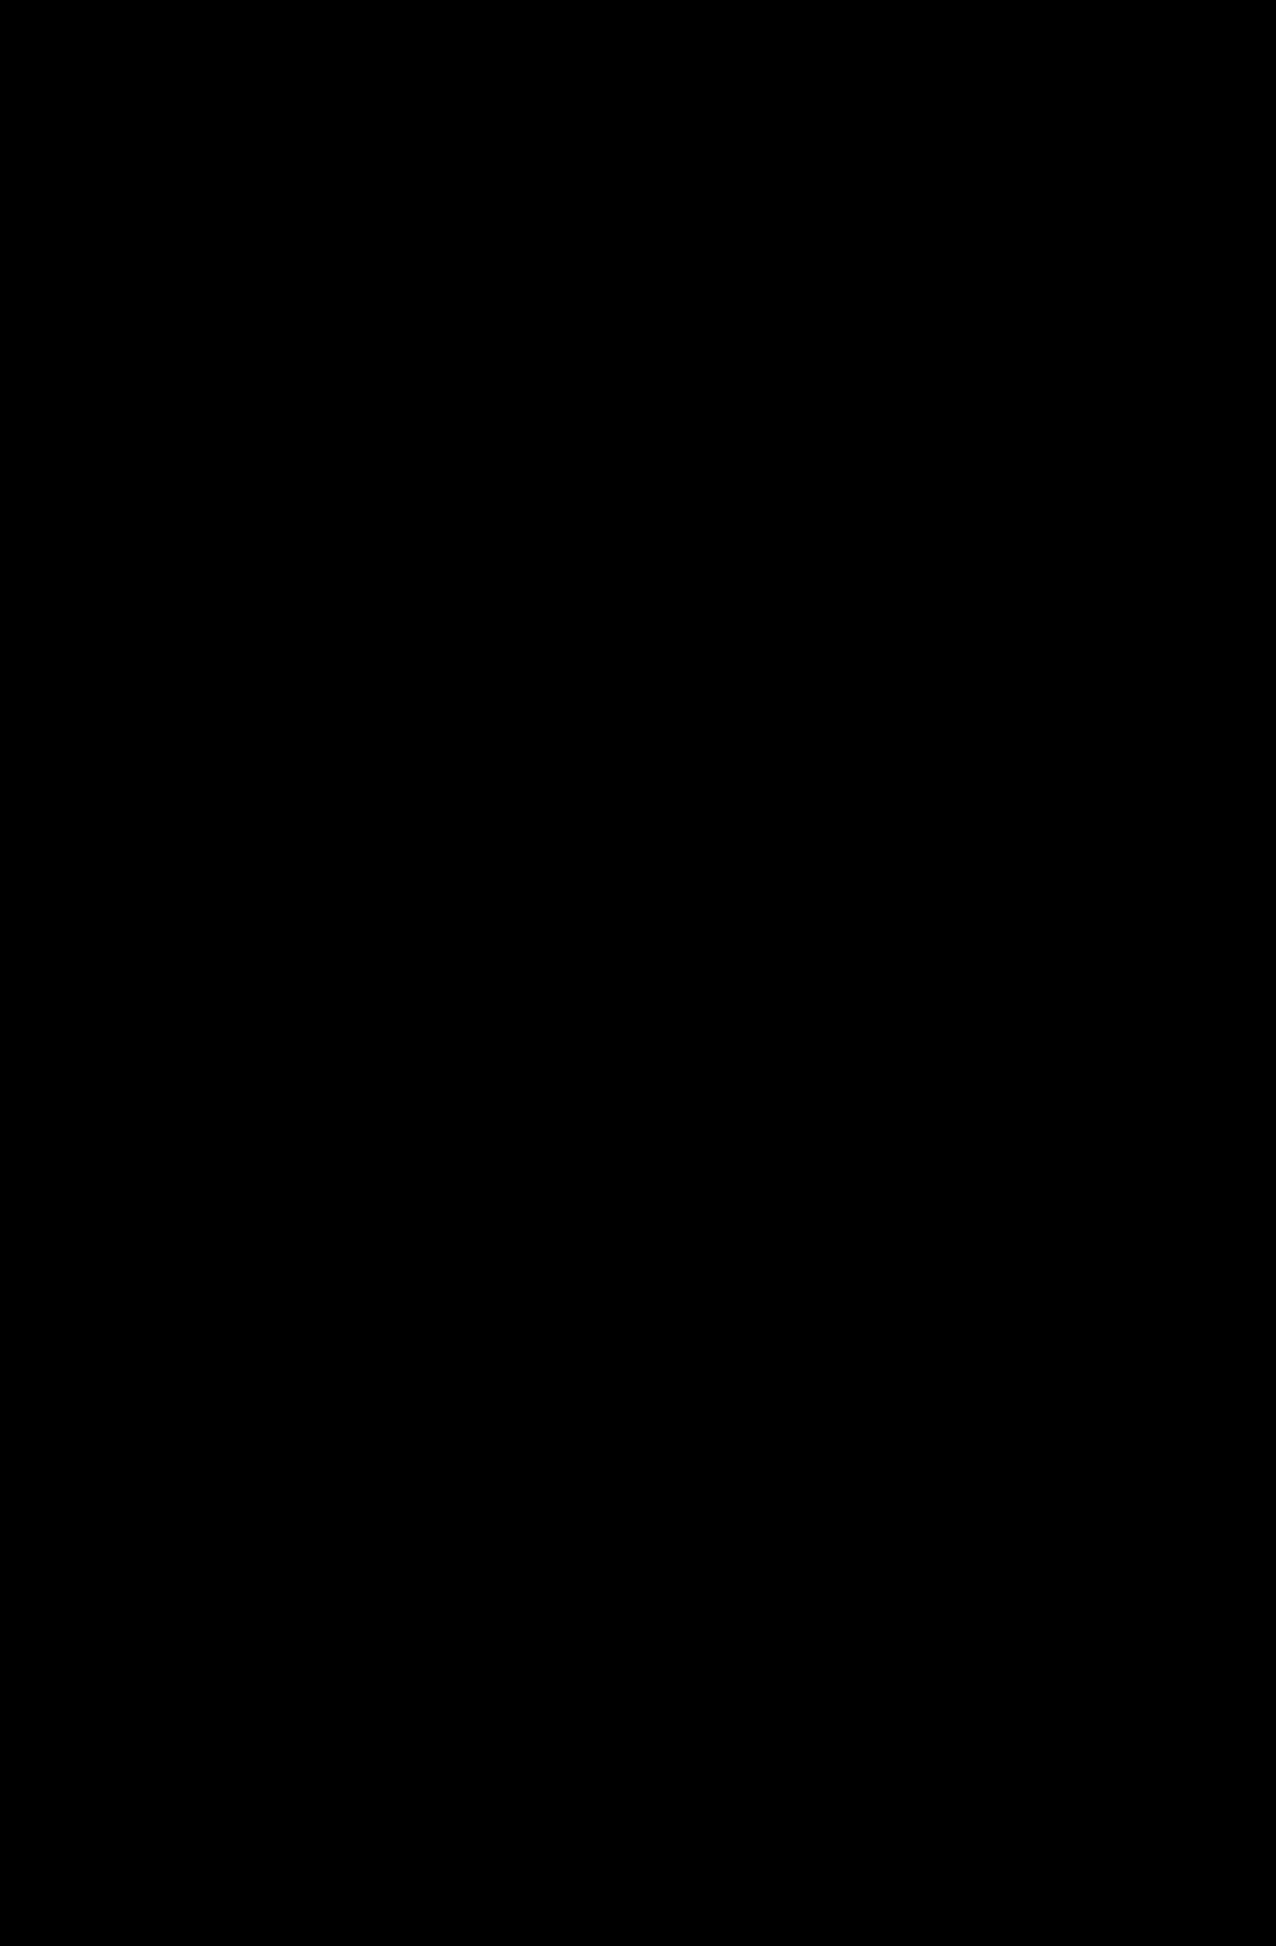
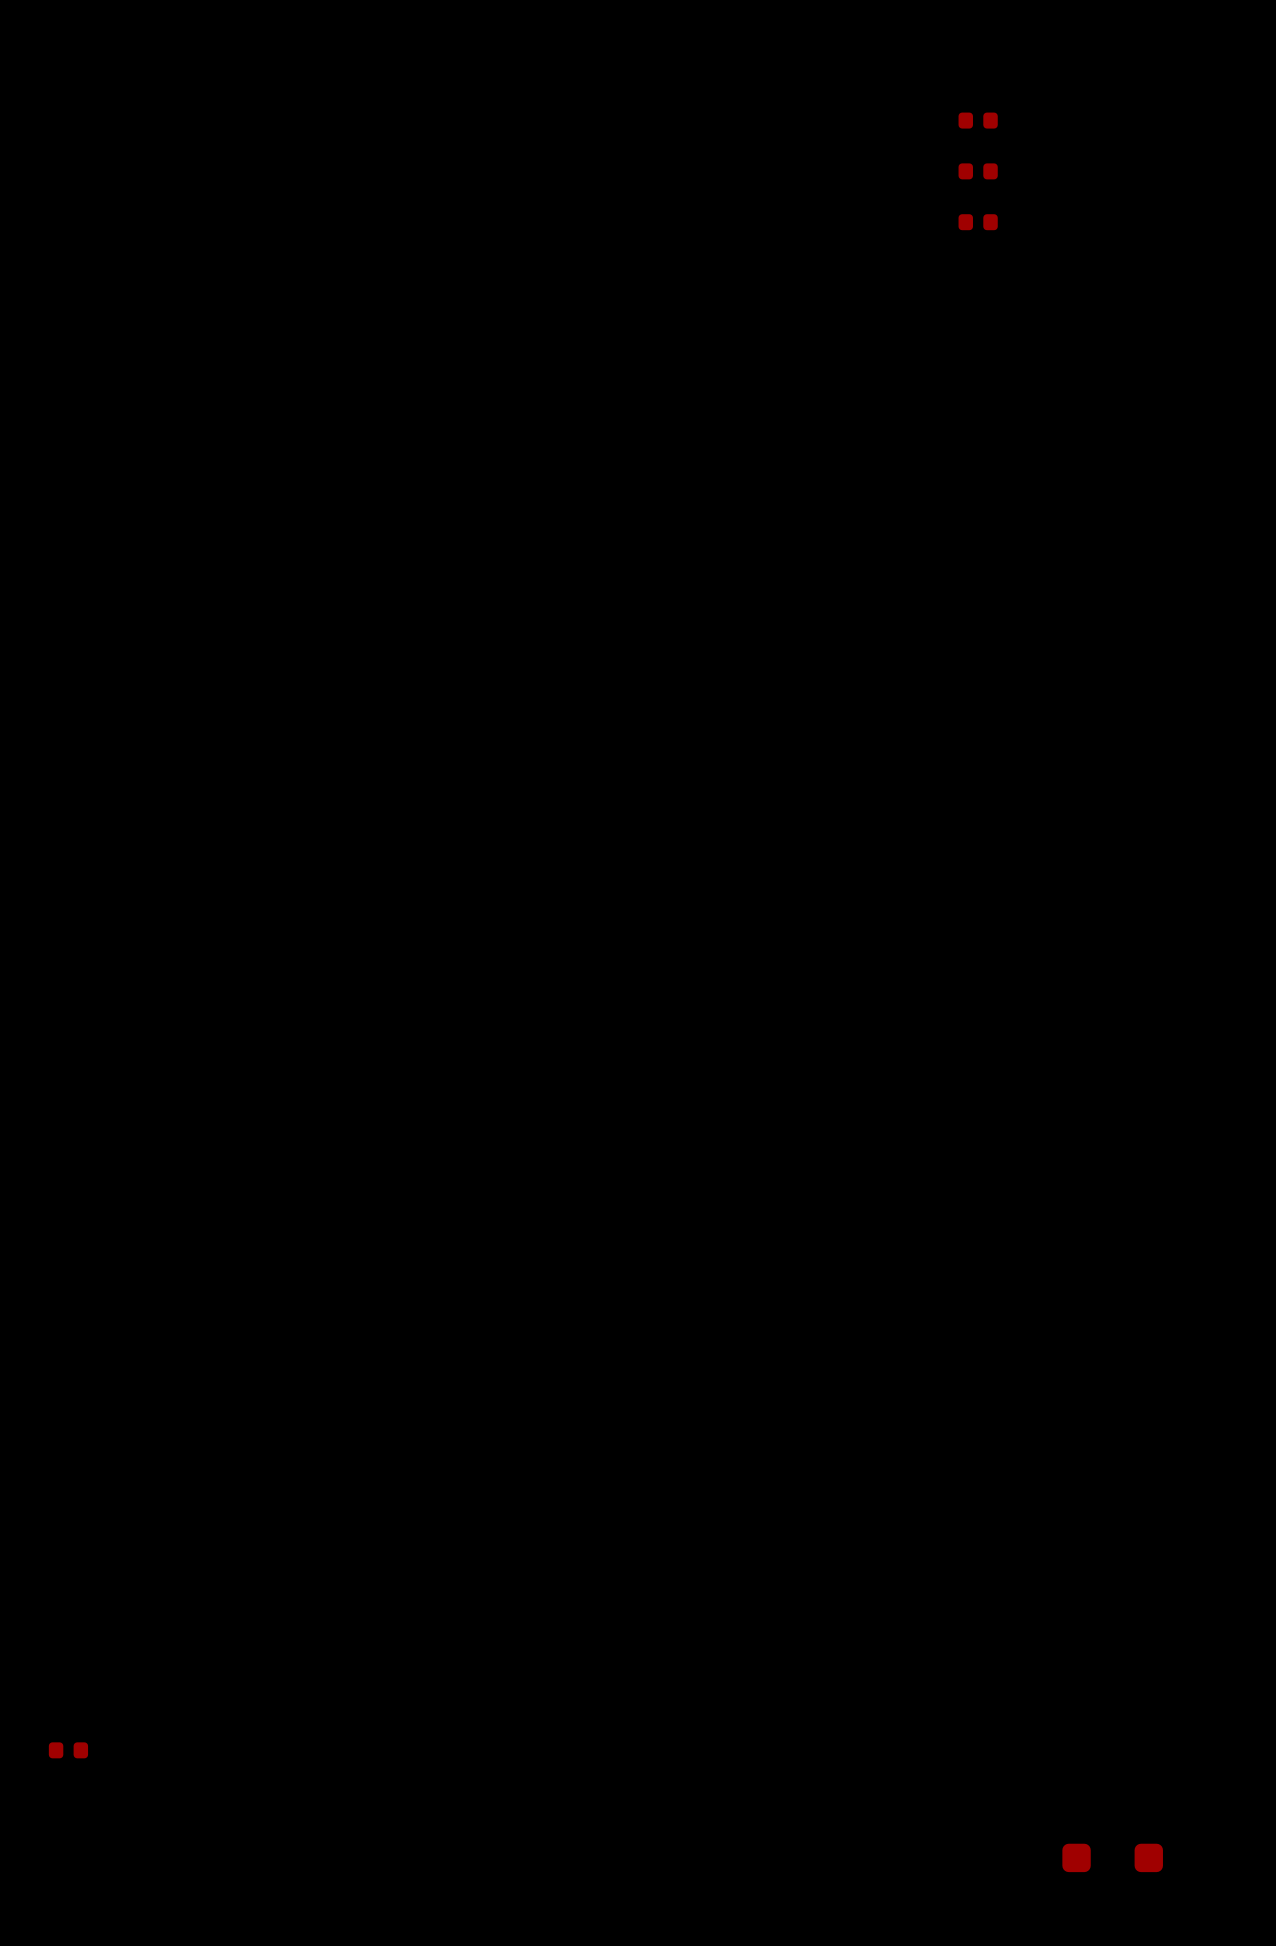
part: none -> (978, 120)
part: none -> (978, 171)
part: none -> (978, 222)
part: none -> (68, 1750)
part: none -> (1112, 1857)

